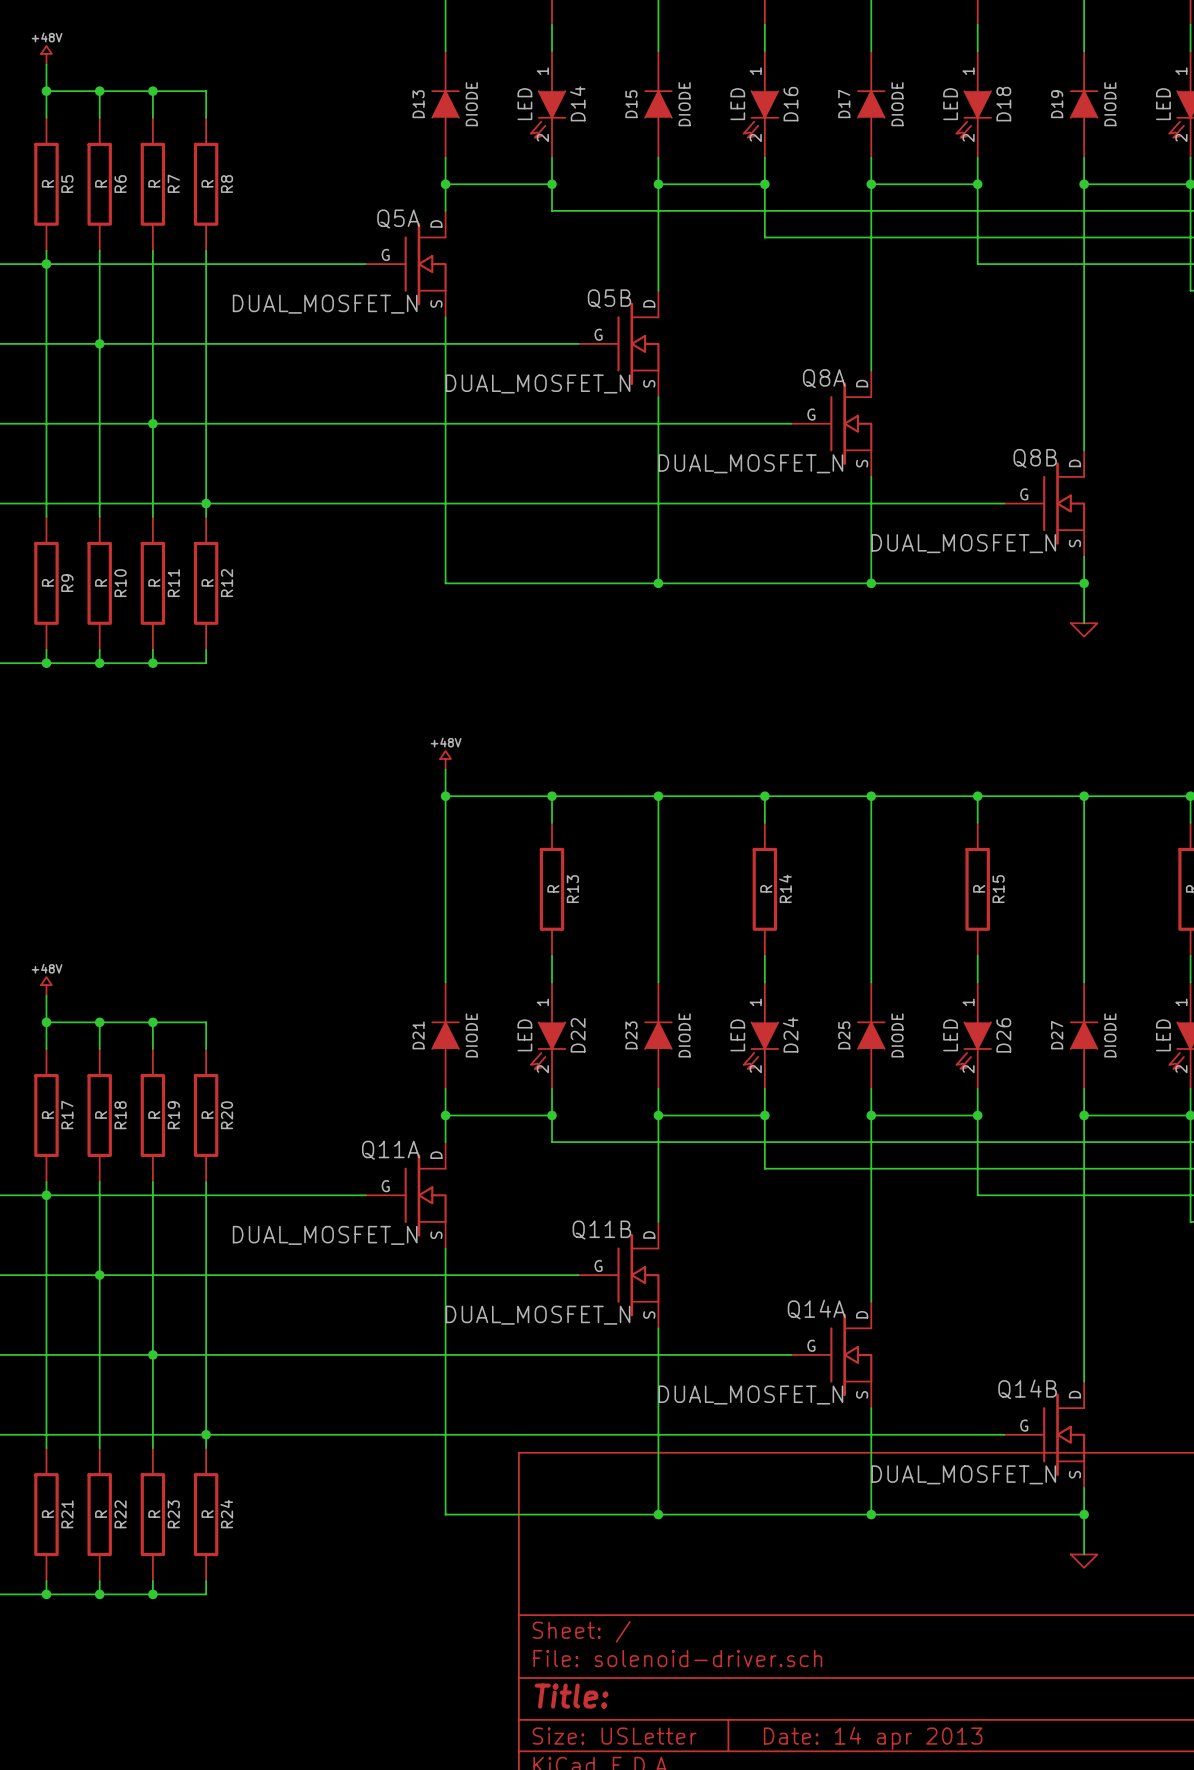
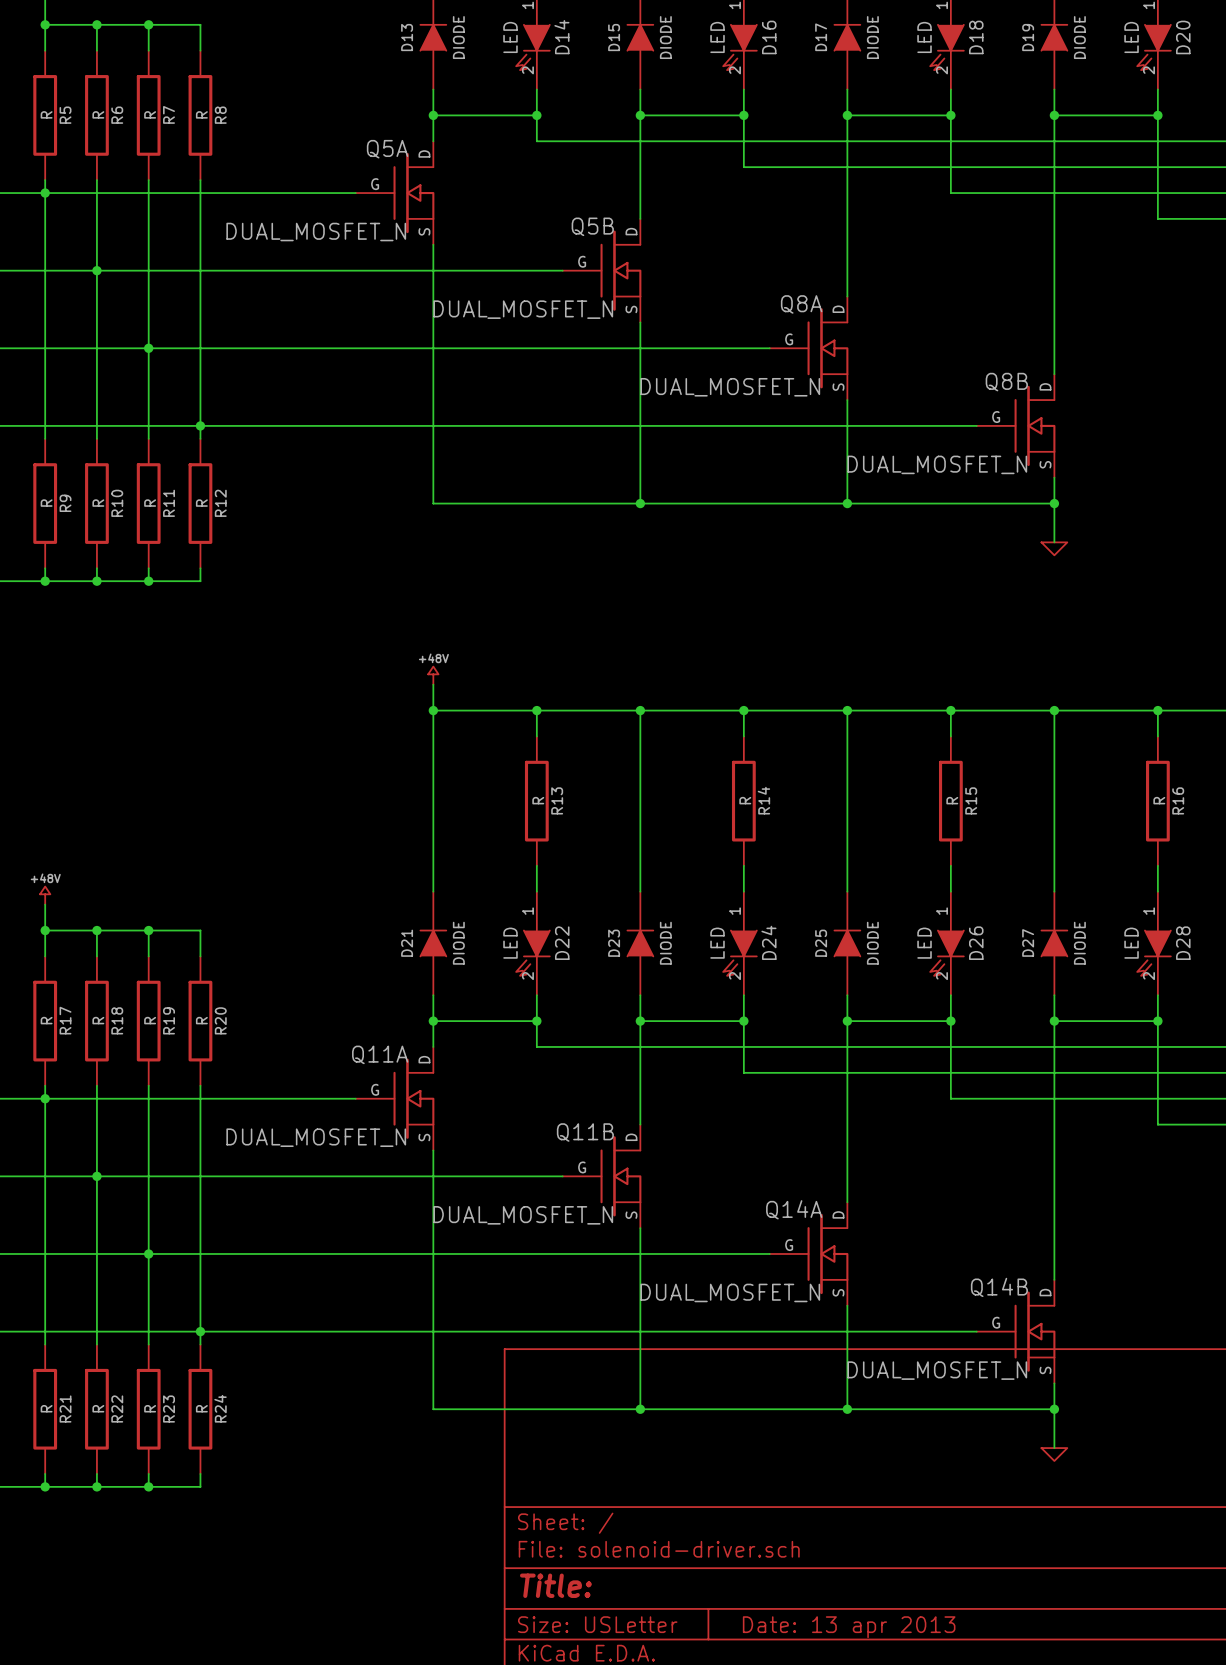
title block: Date: 14 apr 2013 (873, 1738) -> Date: 13 apr 2013 (849, 1627)

